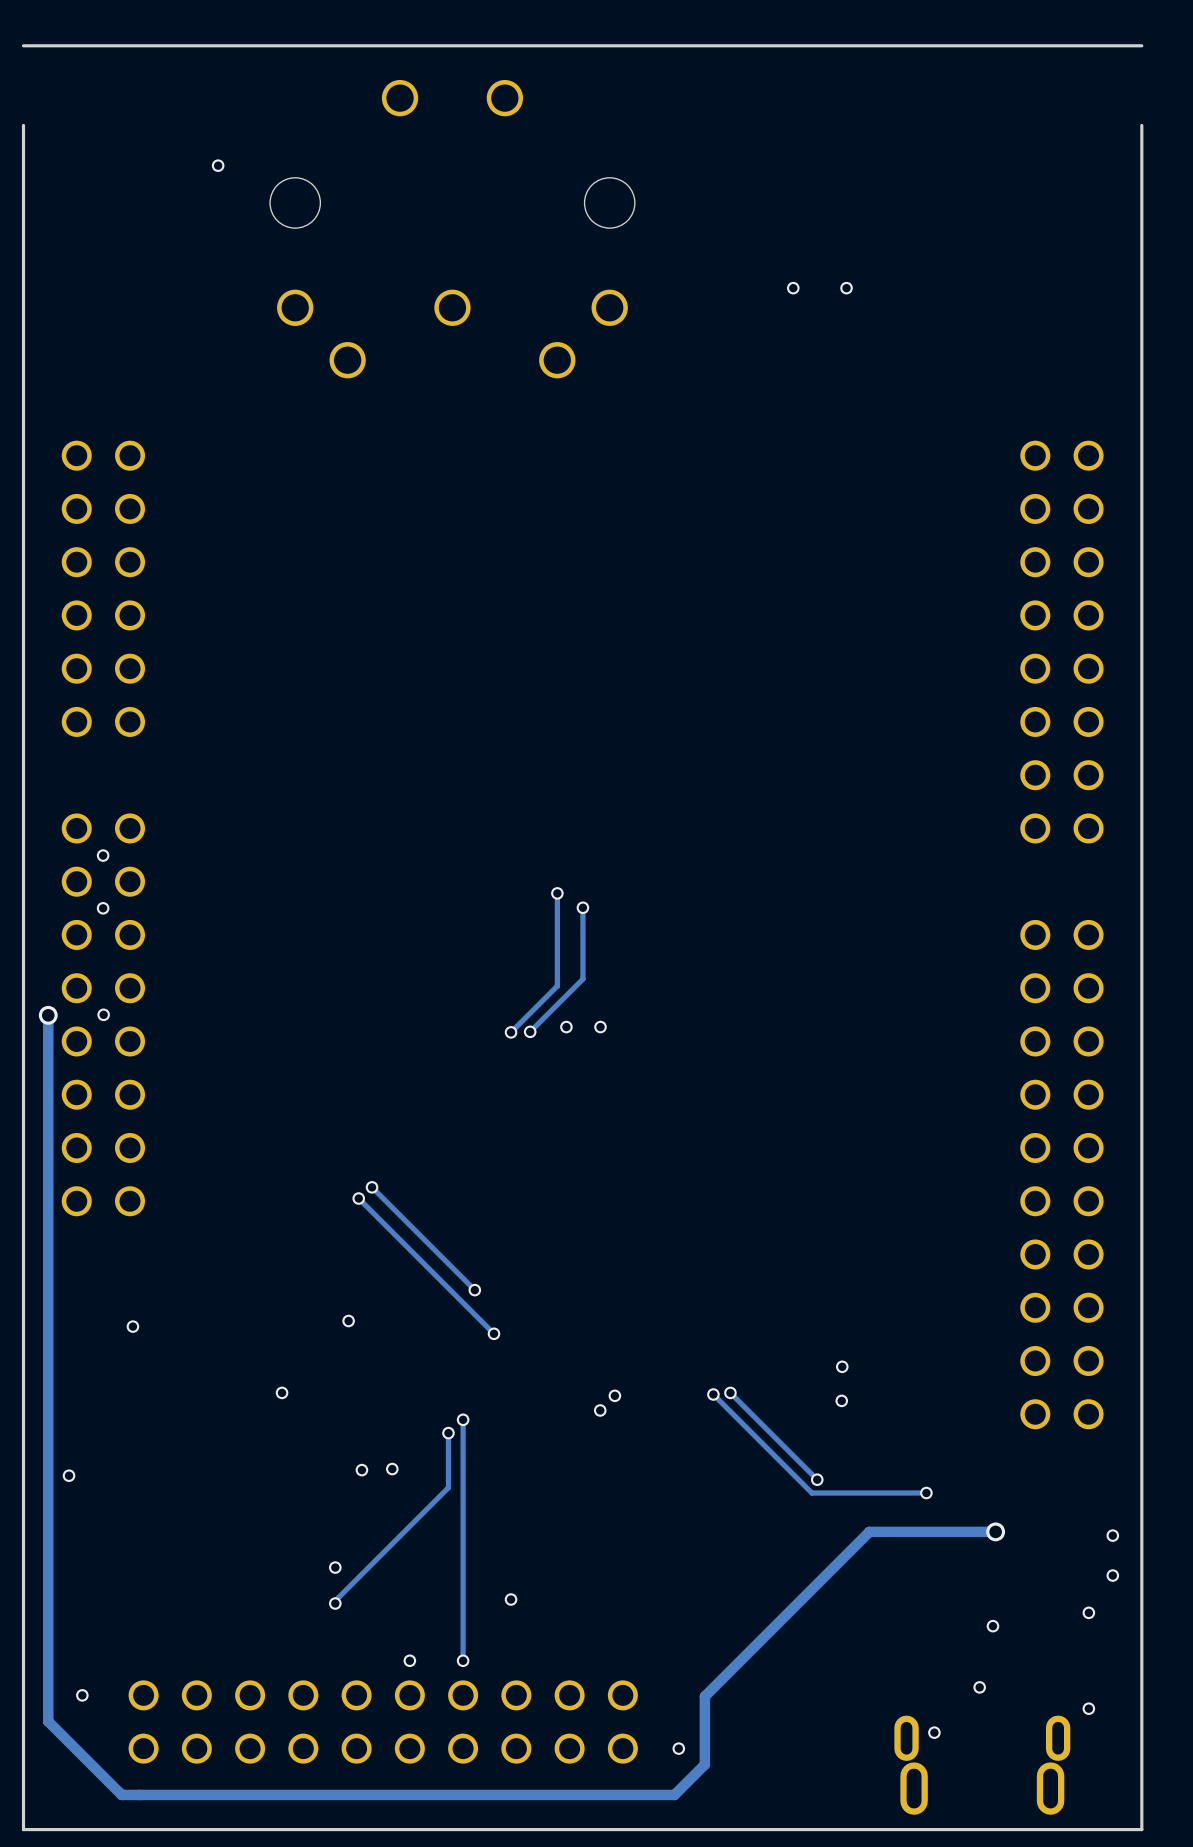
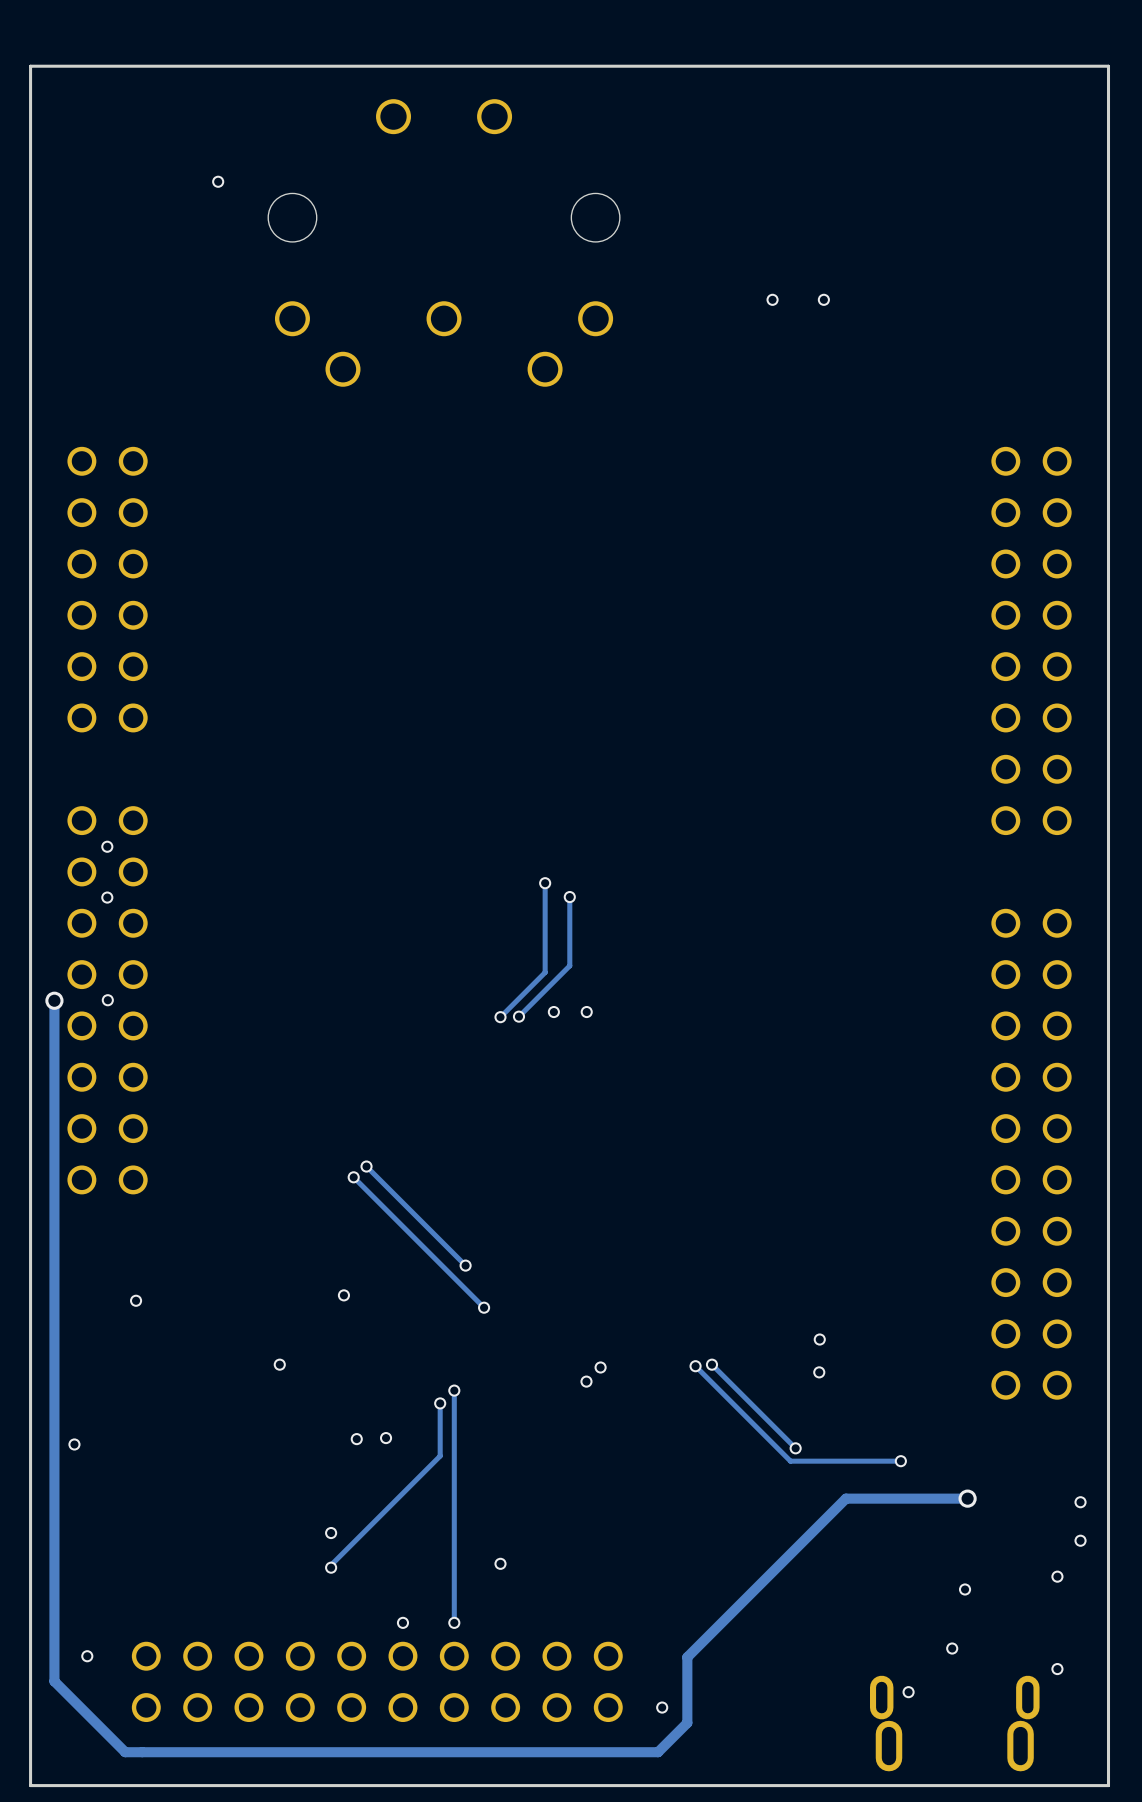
board edge: none -> (30, 66) (30, 143)
board edge: none -> (1108, 66) (1108, 143)

